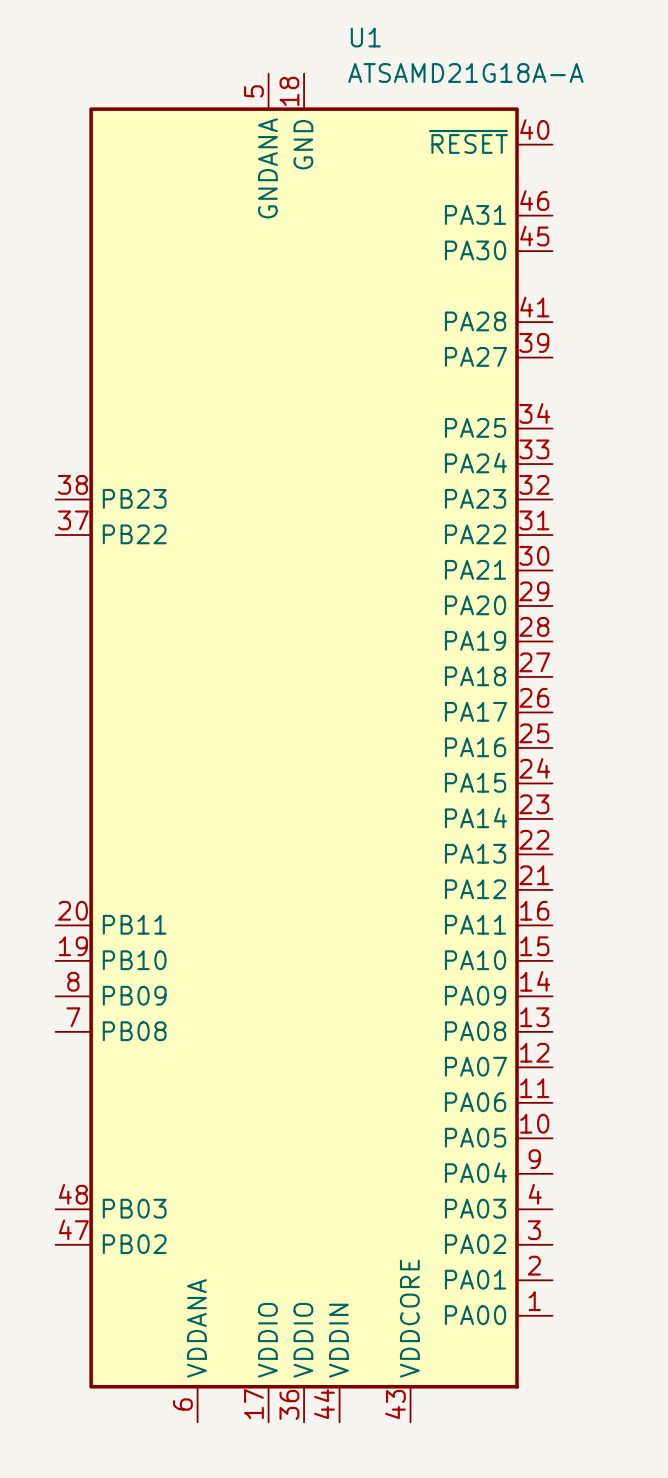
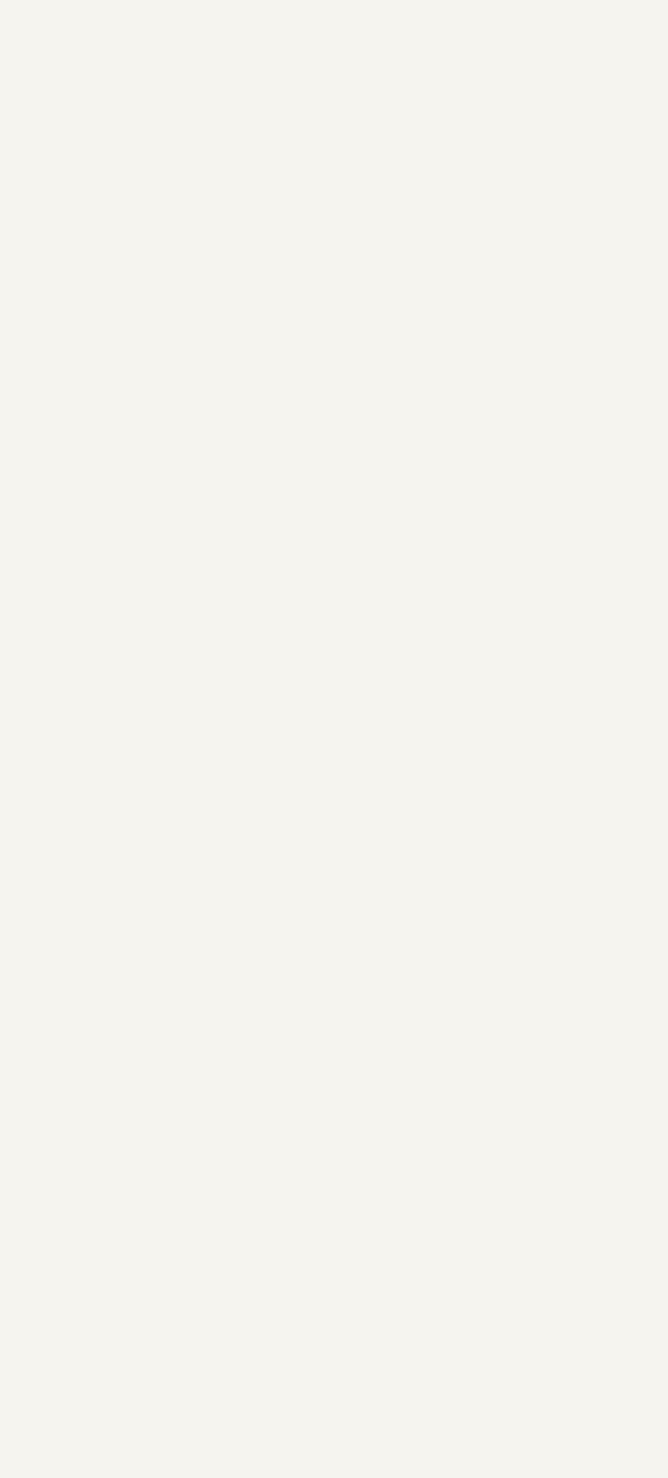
U1: ATSAMD21G18A-A (304, 747) -> none

